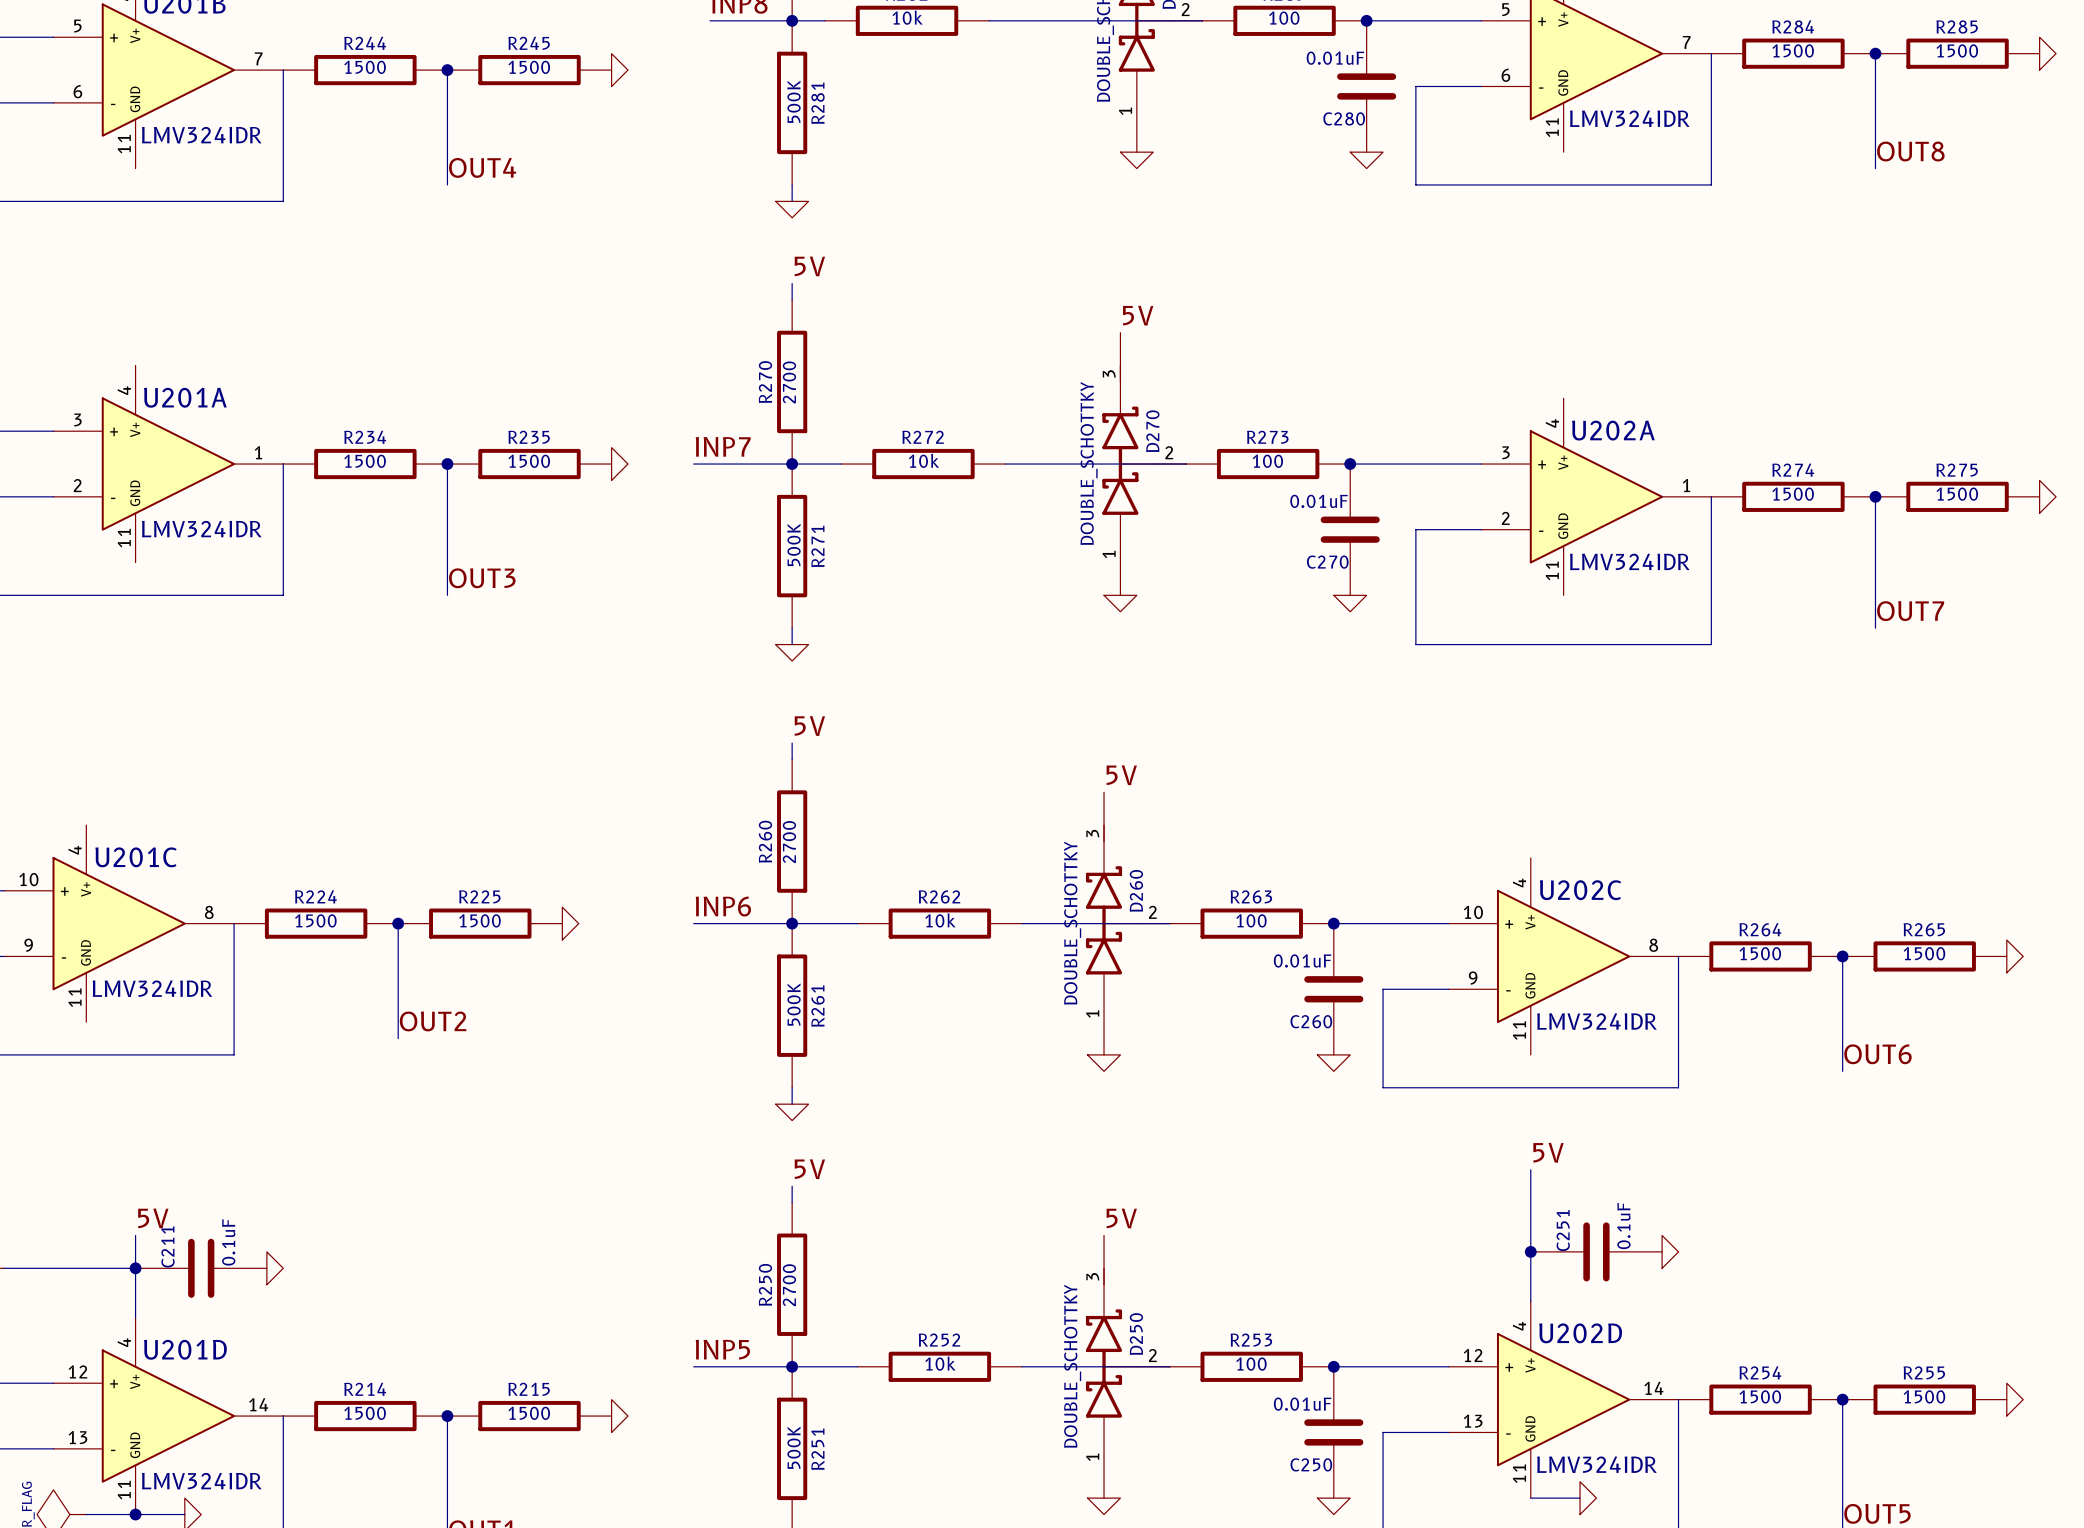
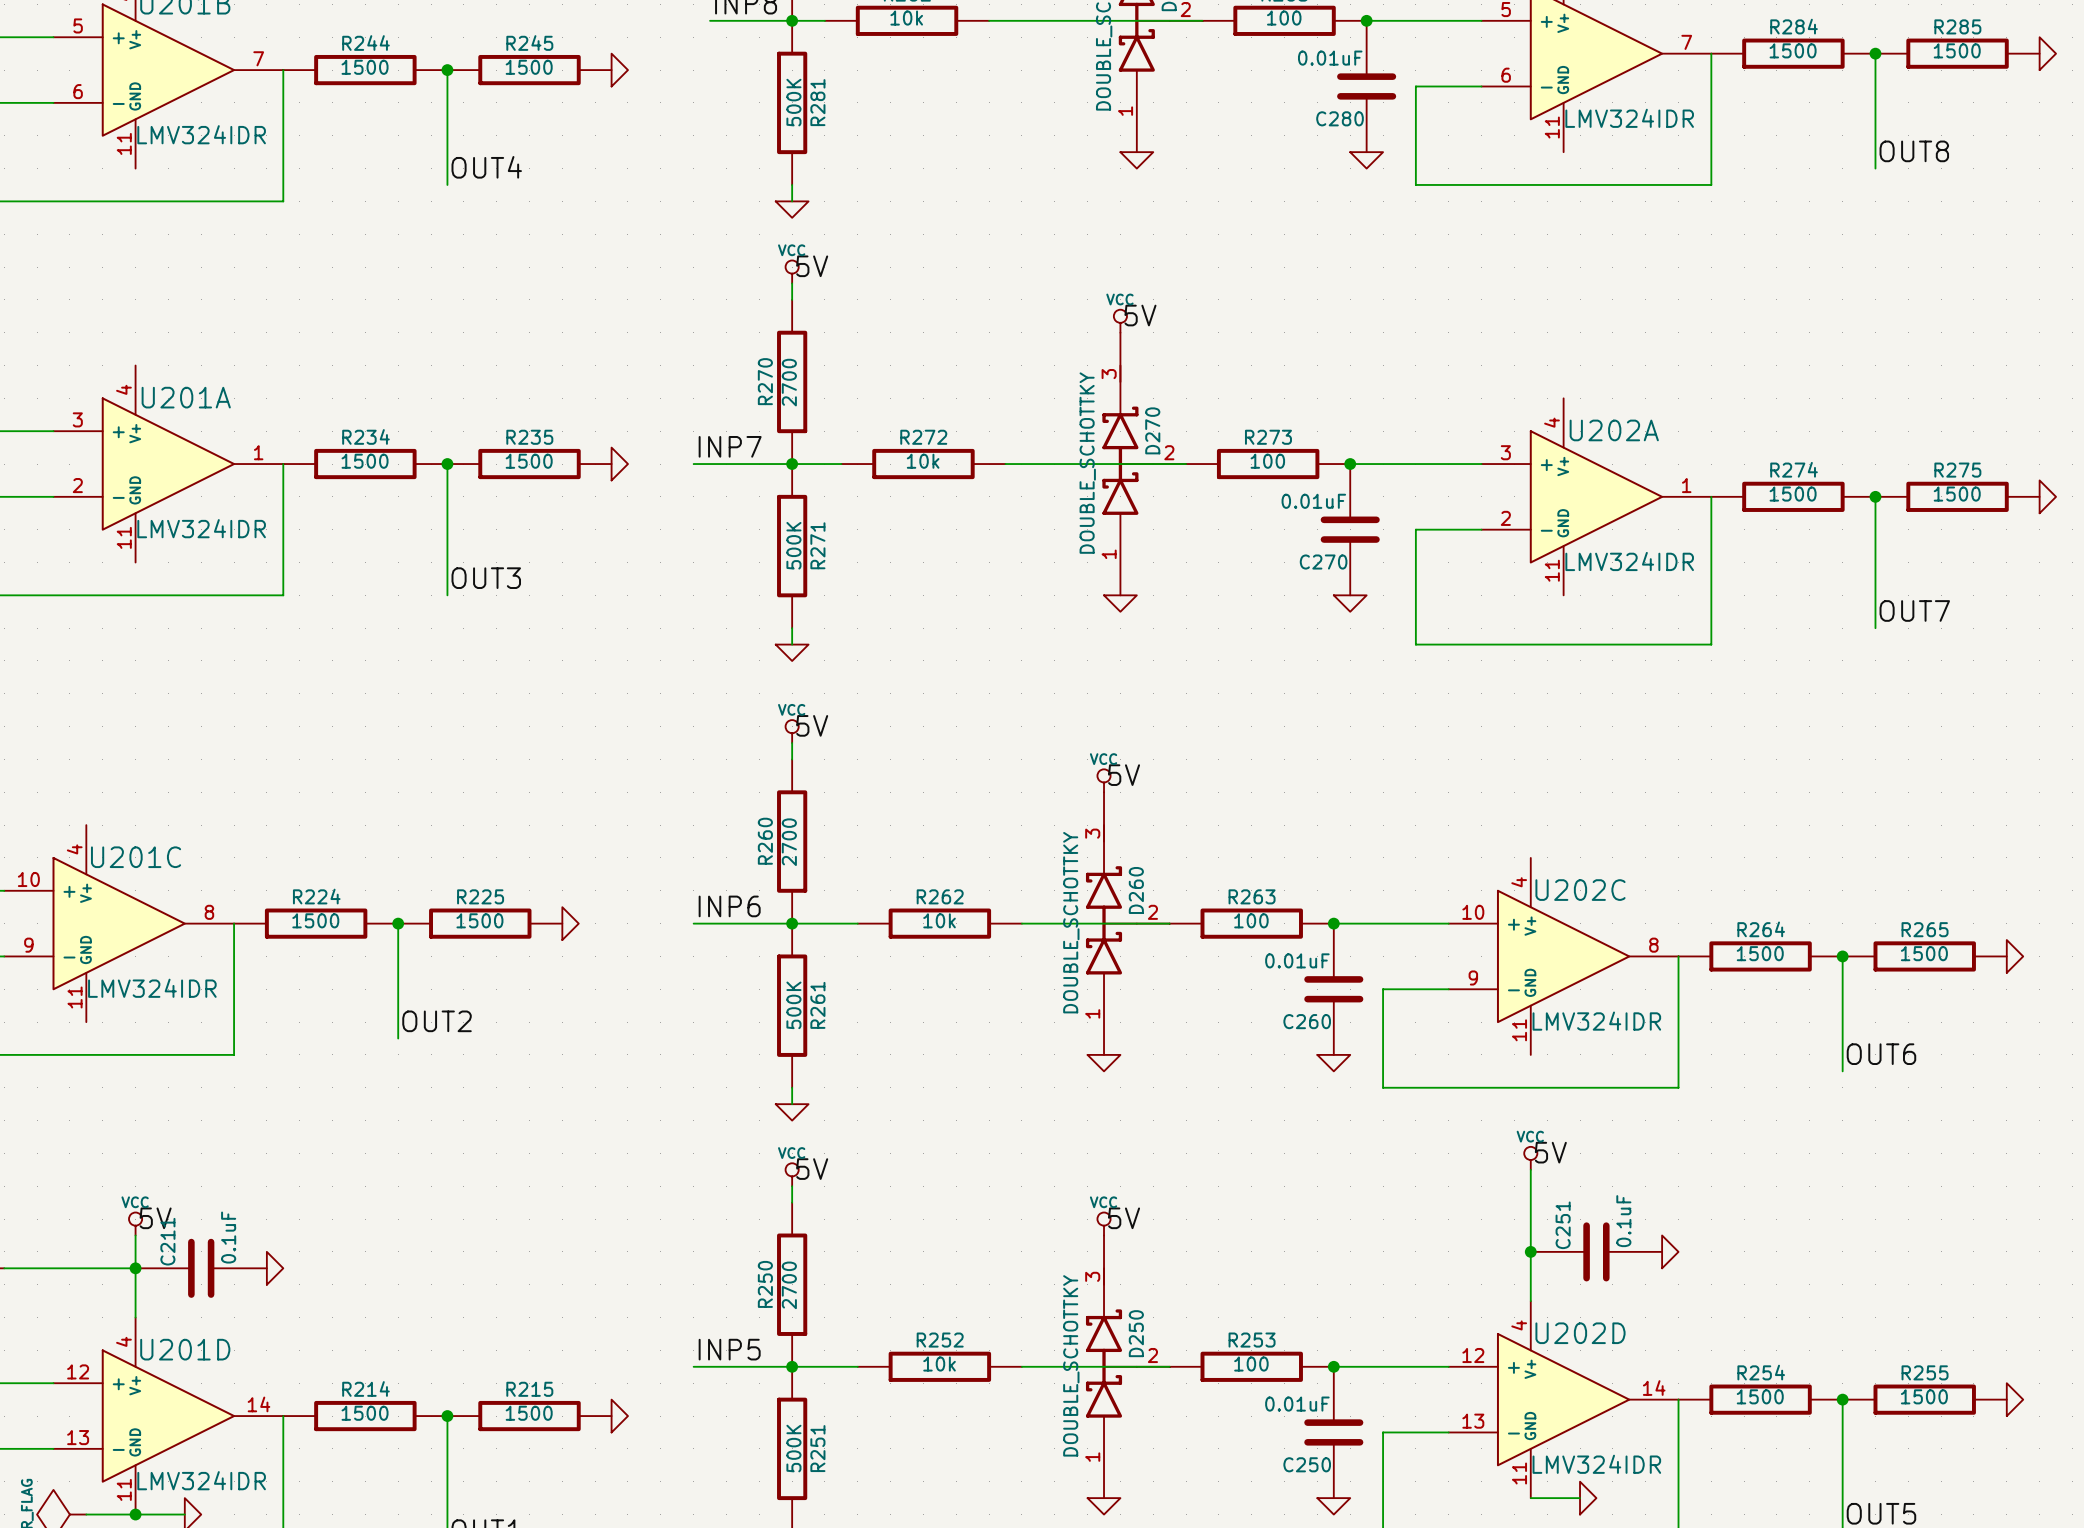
power symbol: none -> VCC (792, 271)
power symbol: none -> VCC (1120, 321)
power symbol: none -> VCC (792, 731)
power symbol: none -> VCC (1104, 780)
power symbol: none -> VCC (1530, 1158)
power symbol: none -> VCC (792, 1174)
power symbol: none -> VCC (135, 1224)
power symbol: none -> VCC (1104, 1224)

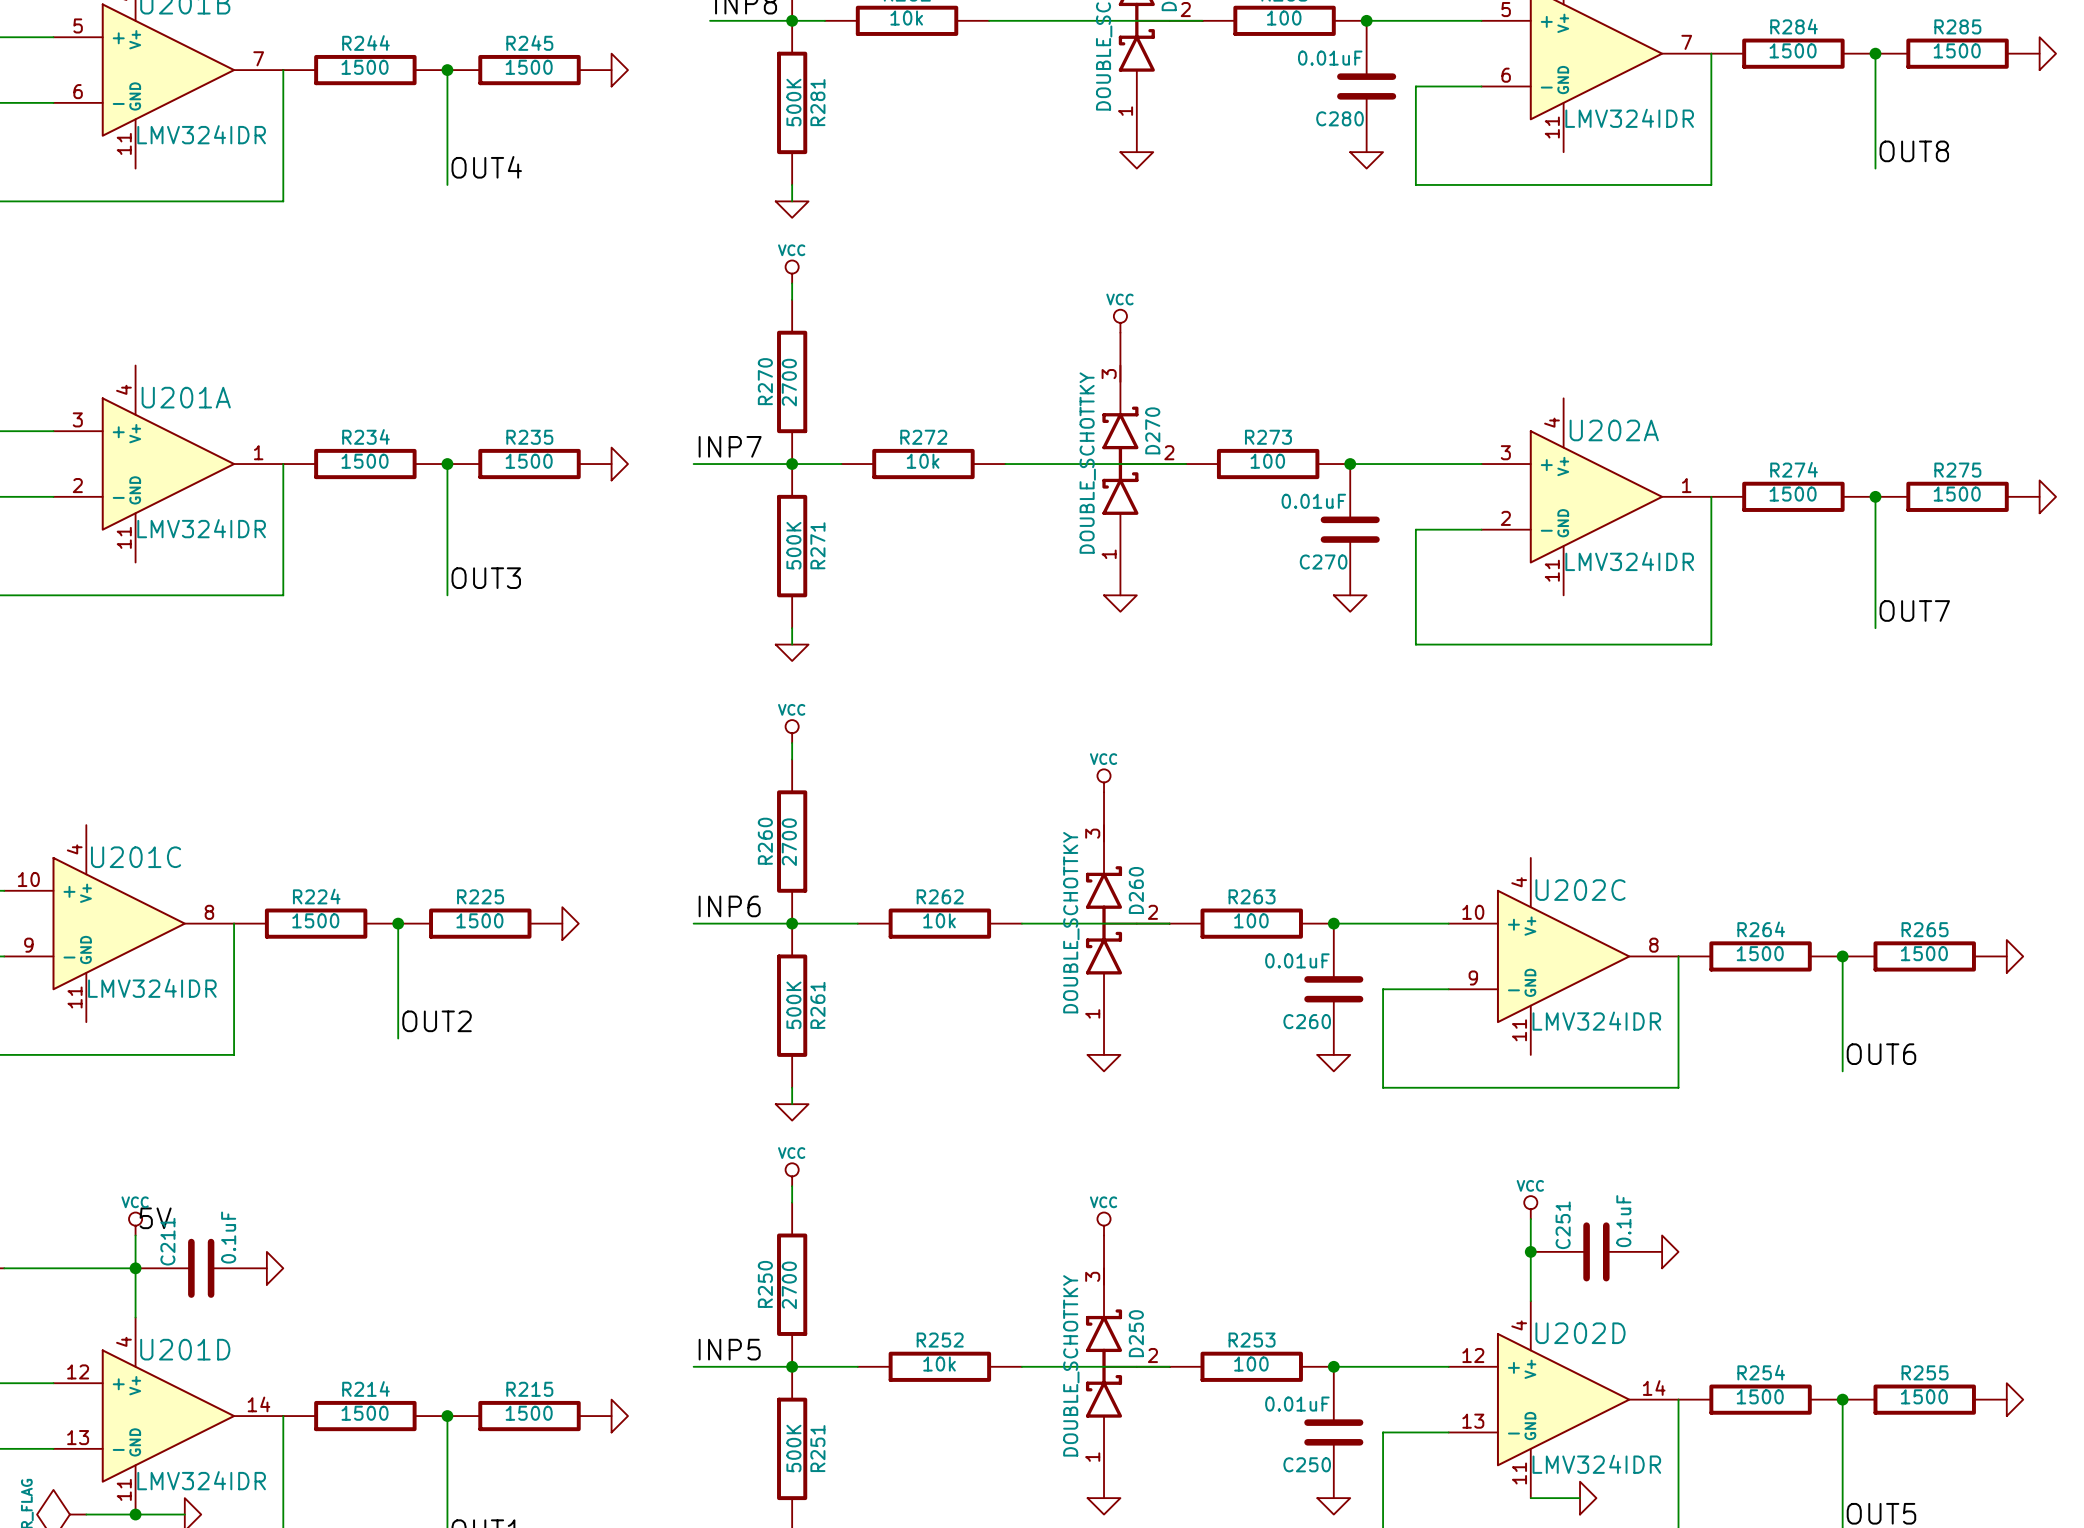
label: 5V (812, 266) -> none
label: 5V (1140, 315) -> none
label: 5V (812, 725) -> none
label: 5V (1124, 775) -> none
label: 5V (1550, 1152) -> none
power symbol position: VCC (1530, 1158) -> VCC (1530, 1207)
label: 5V (812, 1169) -> none
wire: (1530, 1169) (1530, 1219) -> none
label: 5V (1124, 1218) -> none

